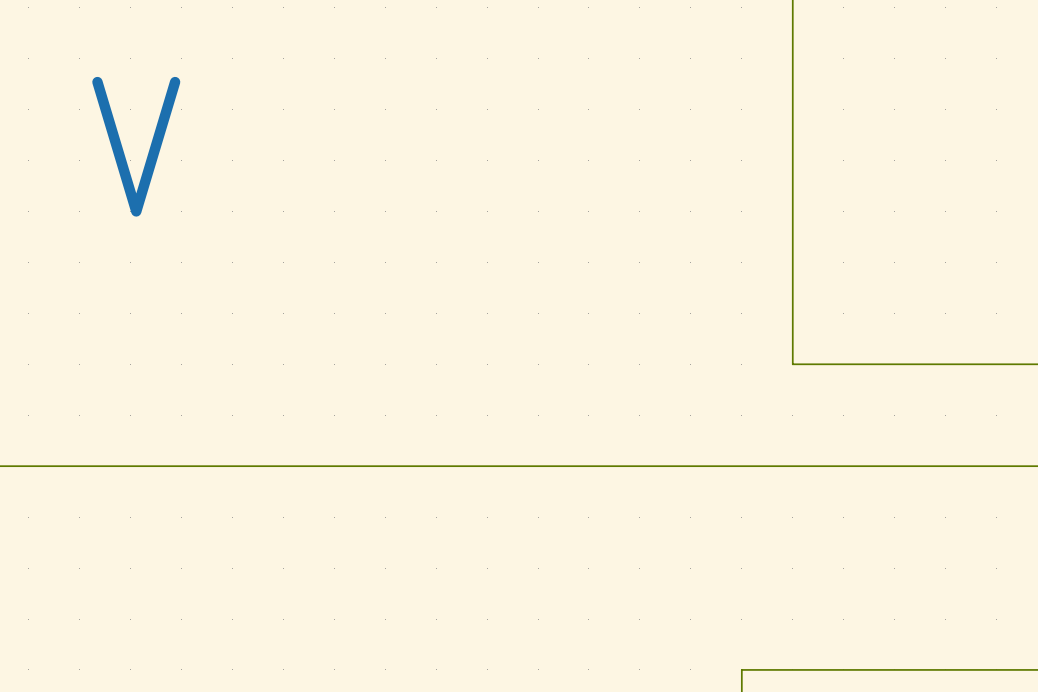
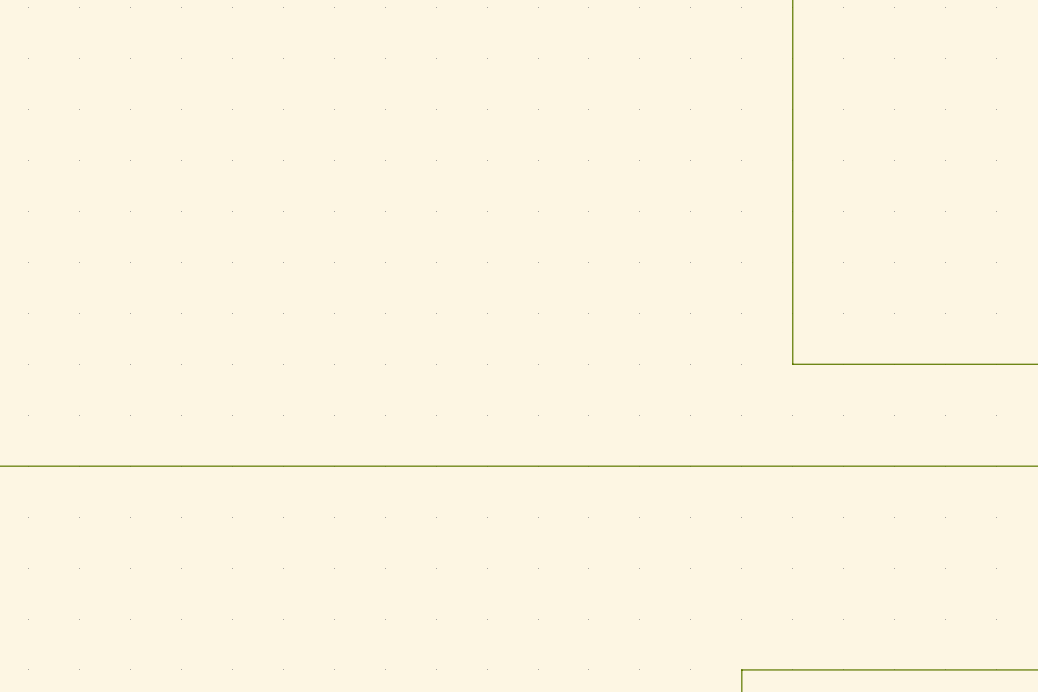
text: V (136, 146) -> none

